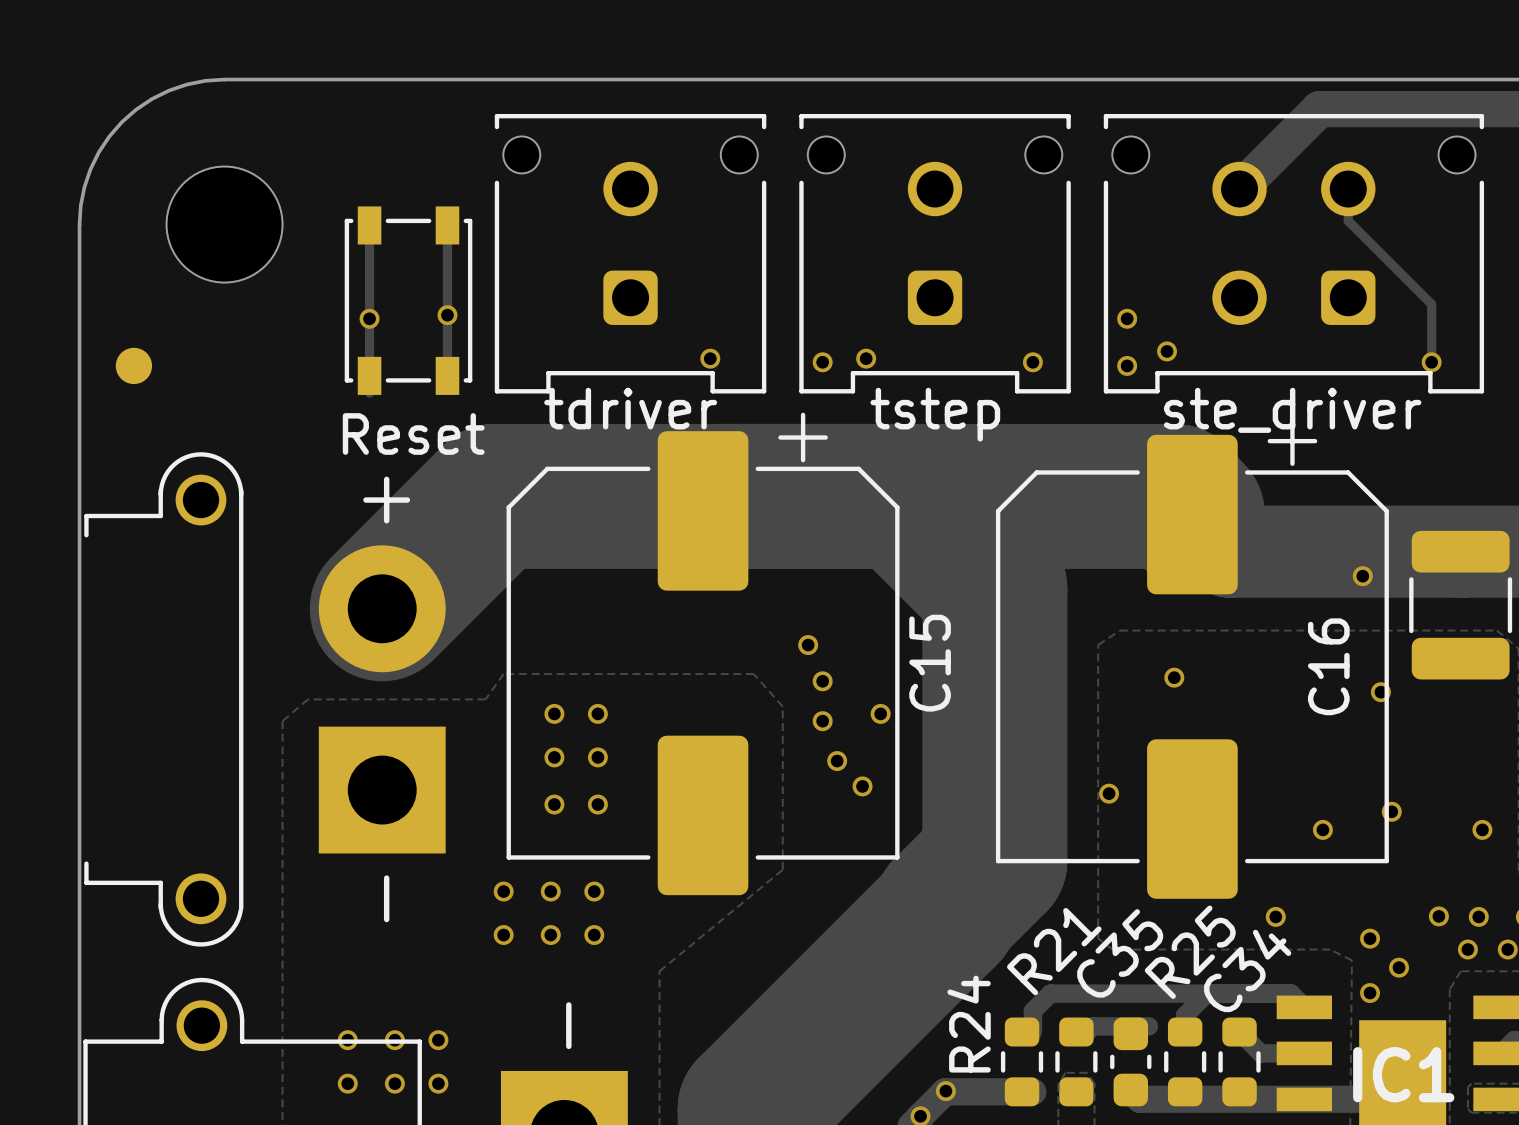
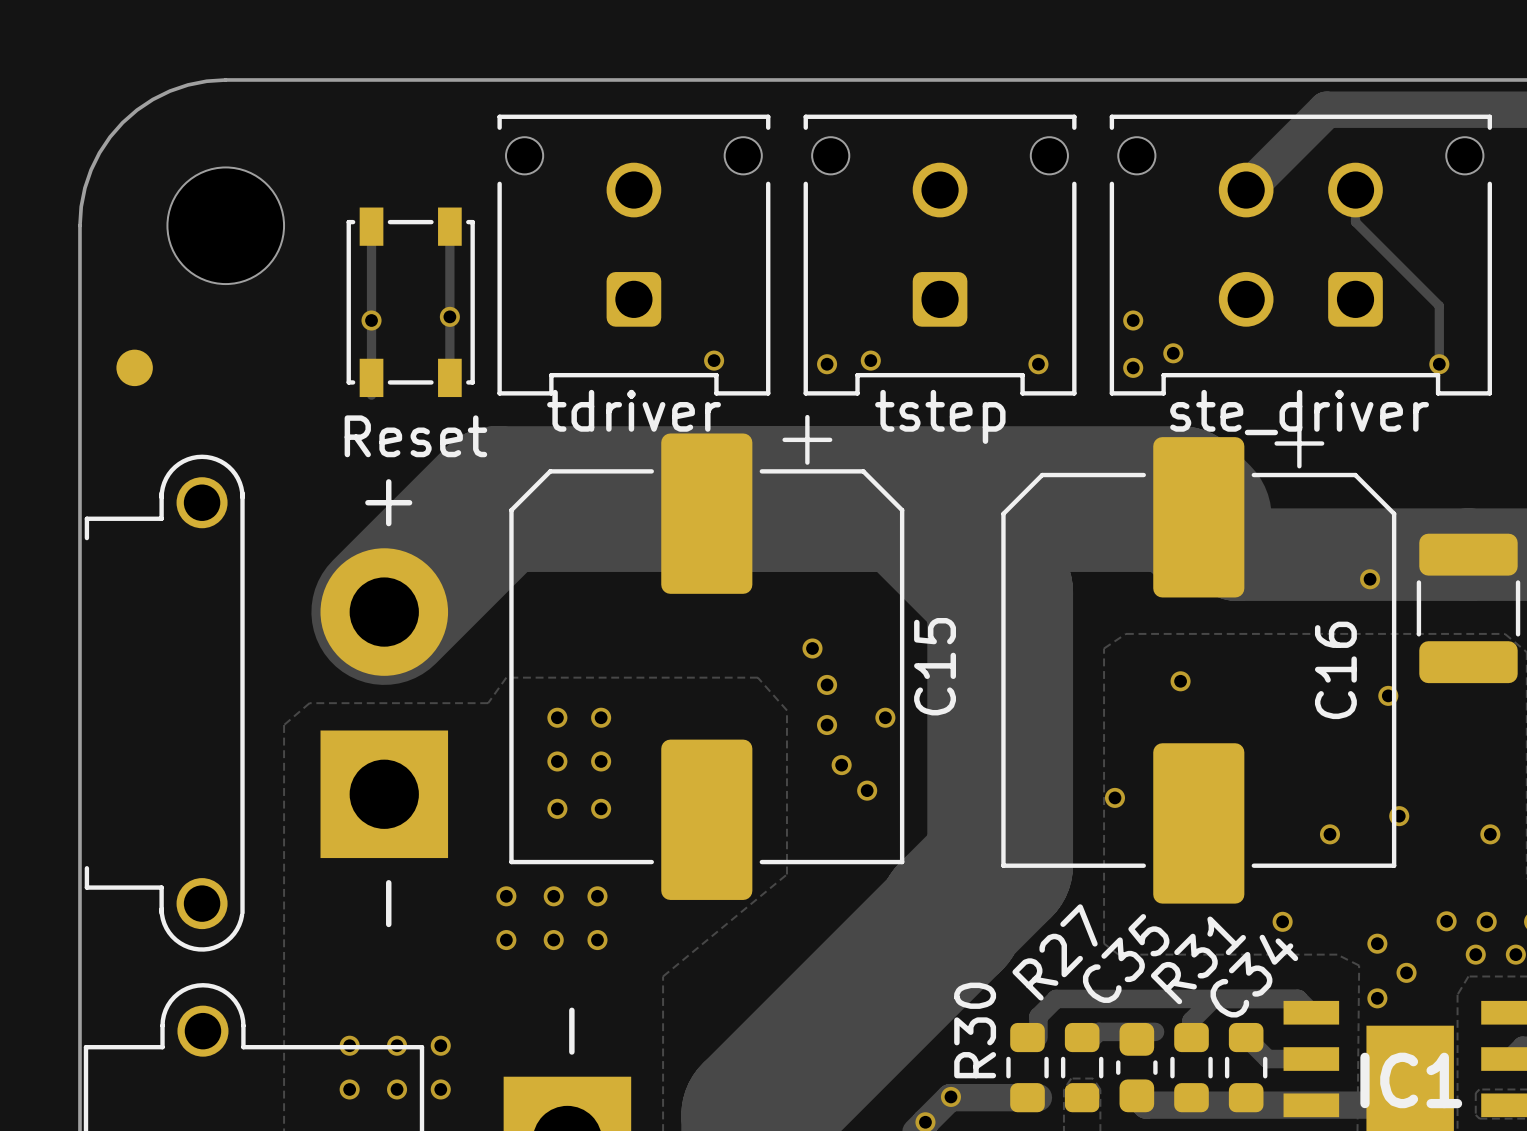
R21 name: R21 (1054, 951) -> R27 (1055, 952)
R25 name: R25 (1190, 952) -> R31 (1198, 960)
R24 name: R24 (969, 1024) -> R30 (975, 1030)

